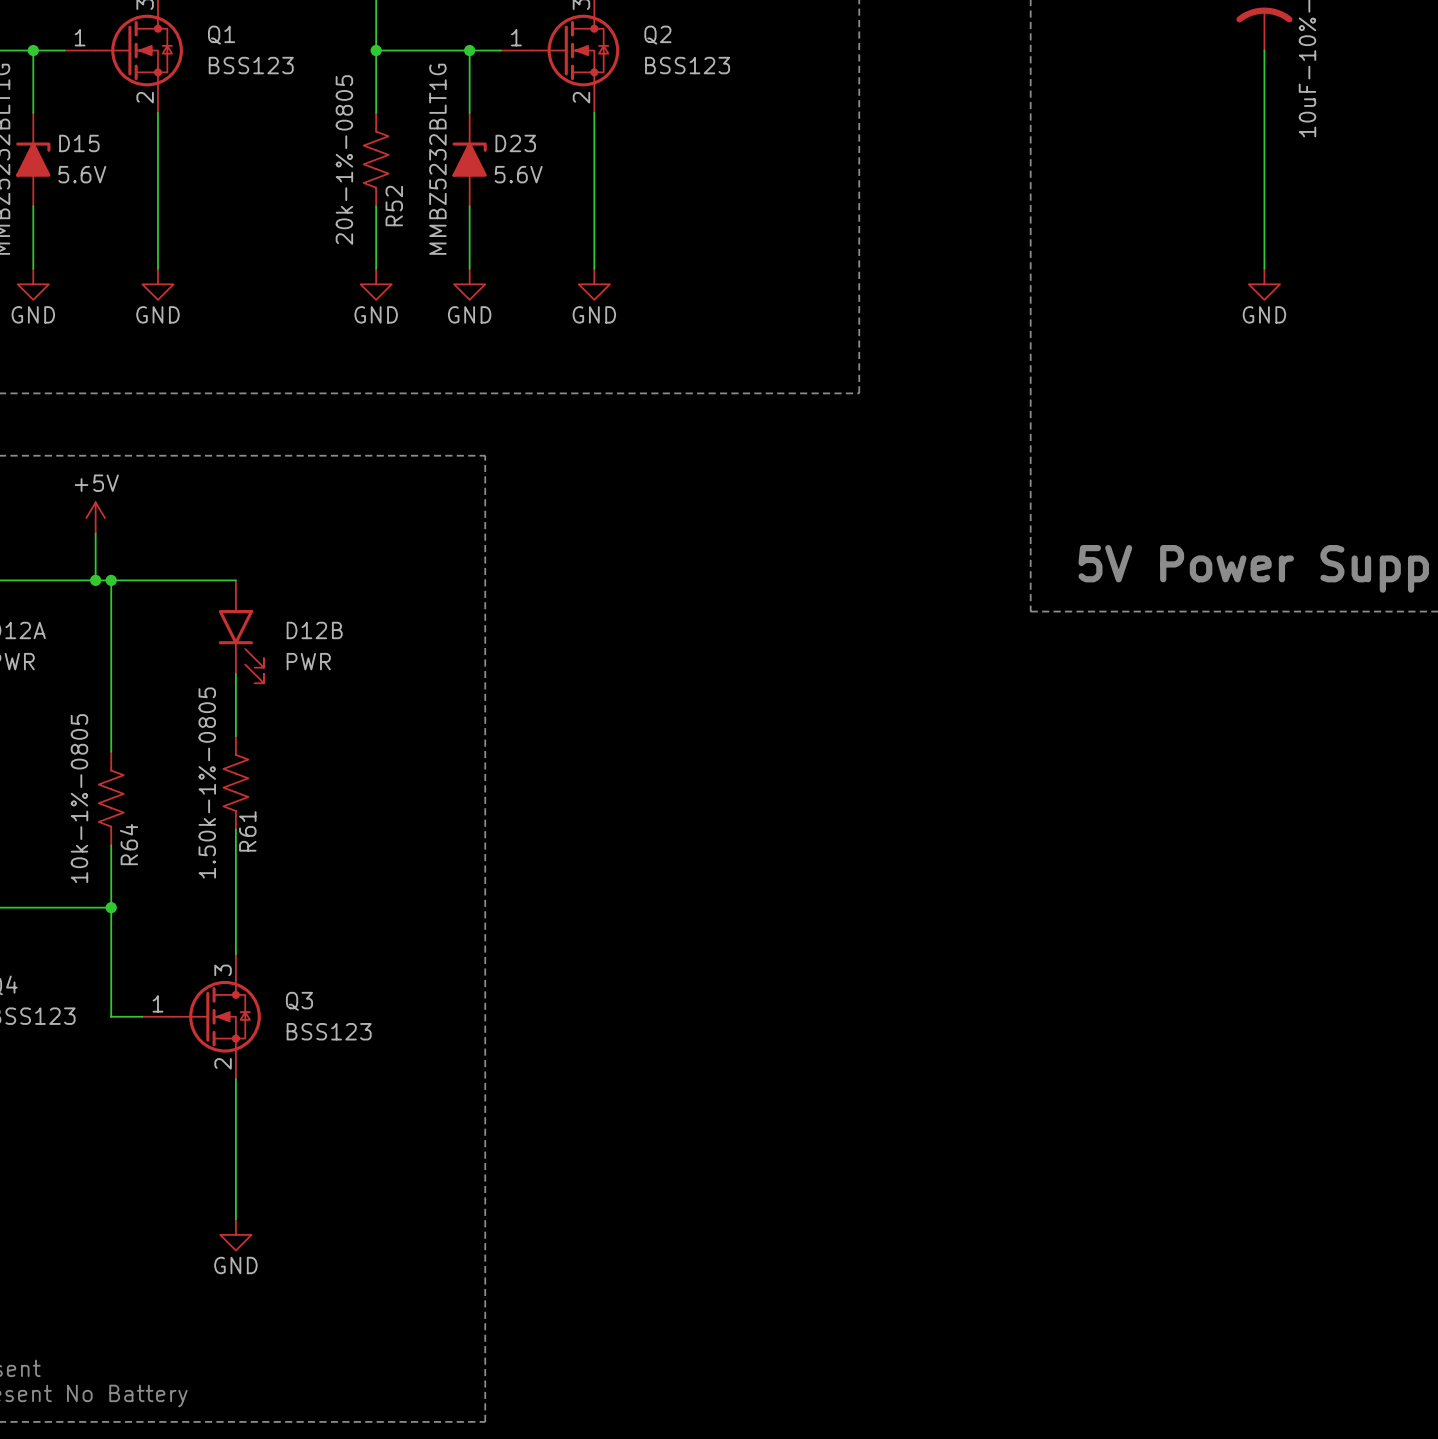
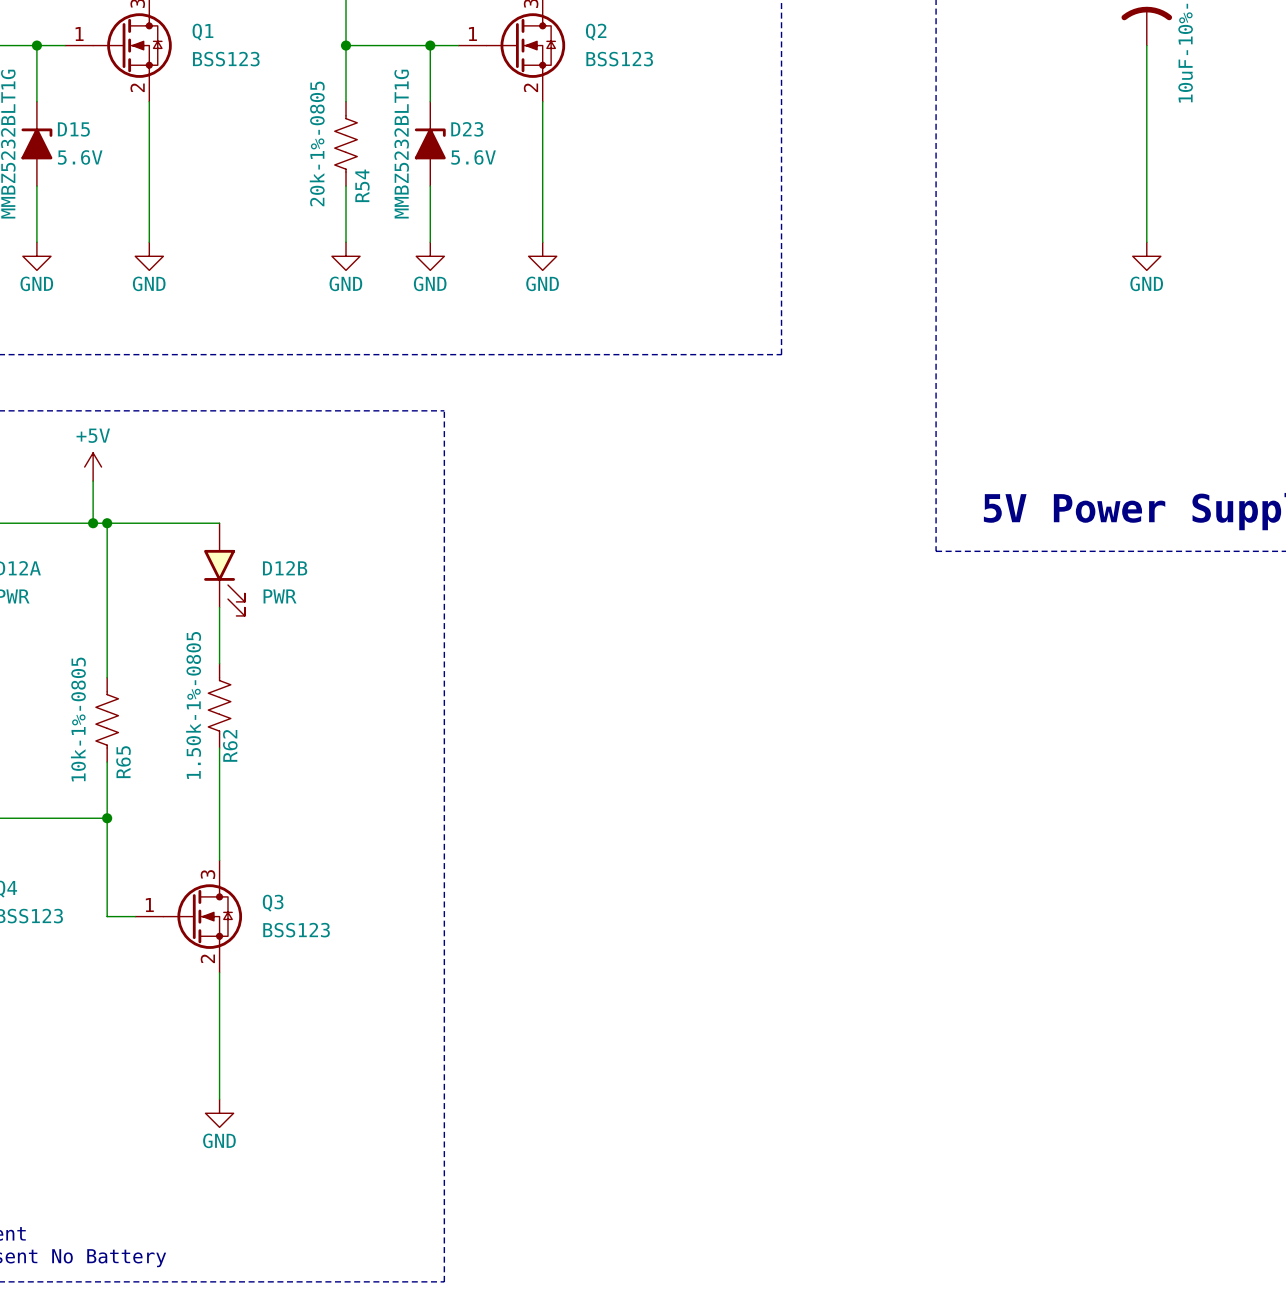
R52 name: R52 (394, 206) -> R54 (362, 185)
R61 name: R61 (247, 831) -> R62 (230, 745)
R64 name: R64 (128, 844) -> R65 (123, 762)

